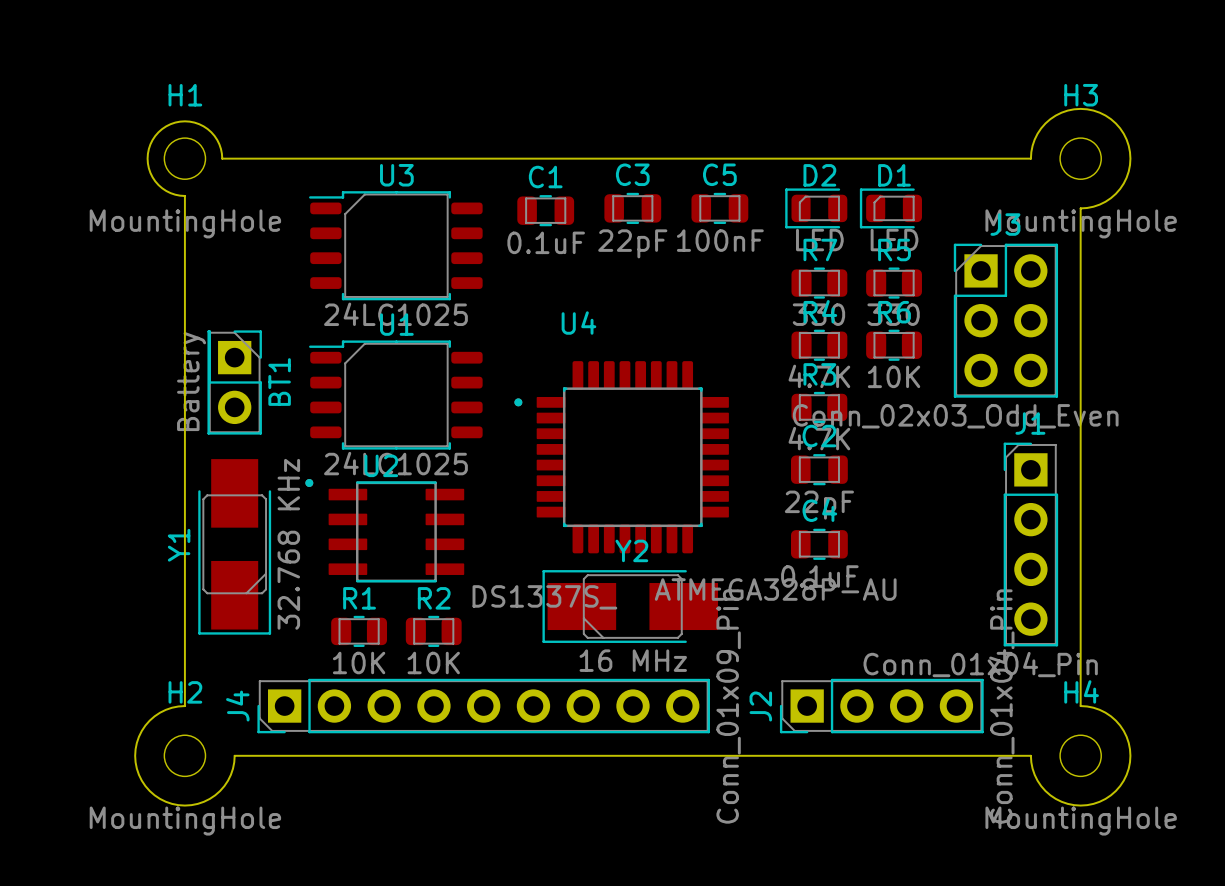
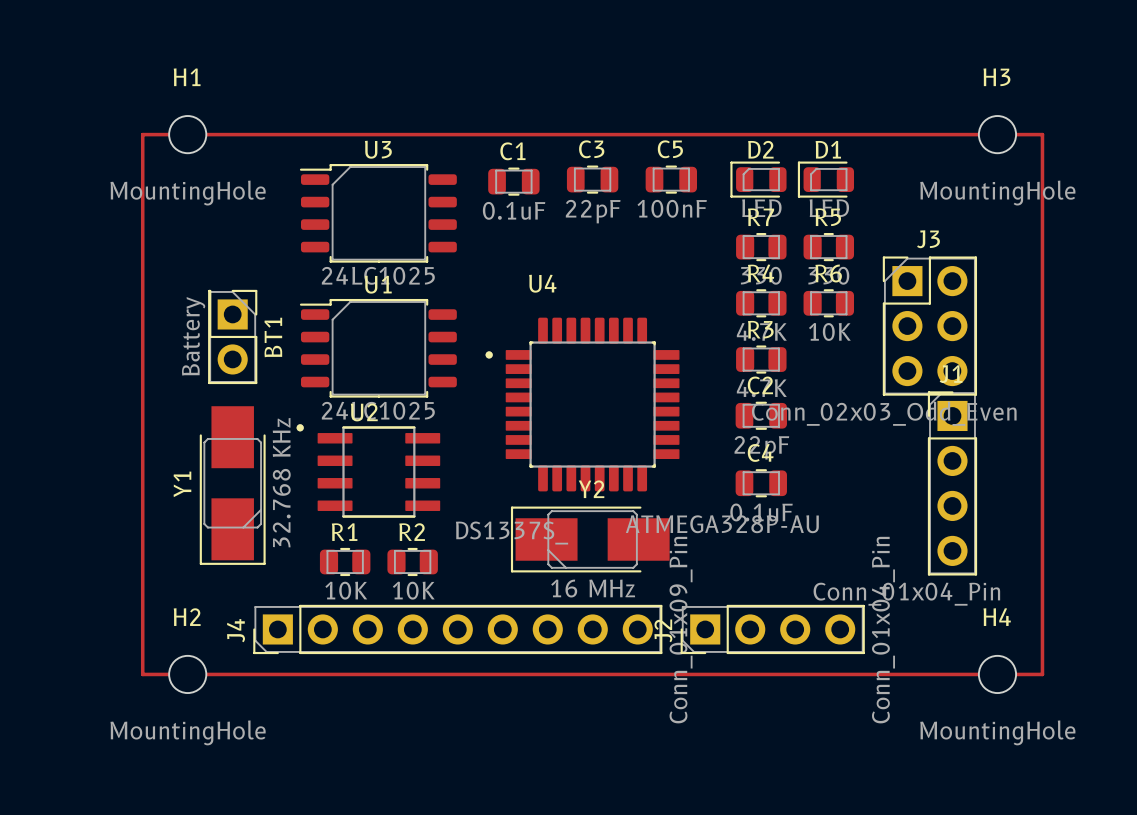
top track: none -> (142, 134) (1042, 134) (1042, 674) (142, 674) (142, 134)
board edge: (222, 158) (1030, 158) (1032, 145) (1037, 133) (1050, 119) (1061, 112) (1074, 109) (1087, 109) (1099, 112) (1110, 119) (1120, 128) (1126, 139) (1130, 158) (1128, 171) (1120, 188) (1110, 198) (1099, 204) (1080, 208) (1080, 706) (1093, 707) (1105, 712) (1120, 725) (1126, 736) (1130, 749) (1130, 762) (1126, 774) (1120, 786) (1110, 795) (1093, 803) (1074, 805) (1061, 801) (1045, 791) (1037, 780) (1032, 768) (1030, 755) (234, 755) (232, 768) (228, 780) (215, 795) (203, 801) (191, 805) (178, 805) (165, 801) (154, 795) (141, 780) (136, 768) (135, 755) (136, 742) (141, 730) (154, 716) (172, 707) (184, 706) (184, 195) (166, 190) (155, 181) (148, 168) (147, 153) (152, 139) (162, 129) (170, 124) (184, 121) (199, 124) (211, 132) (219, 144) (222, 158) -> none
J3 position: (1005, 320) -> (929, 326)
J2 position: (881, 706) -> (772, 629)

